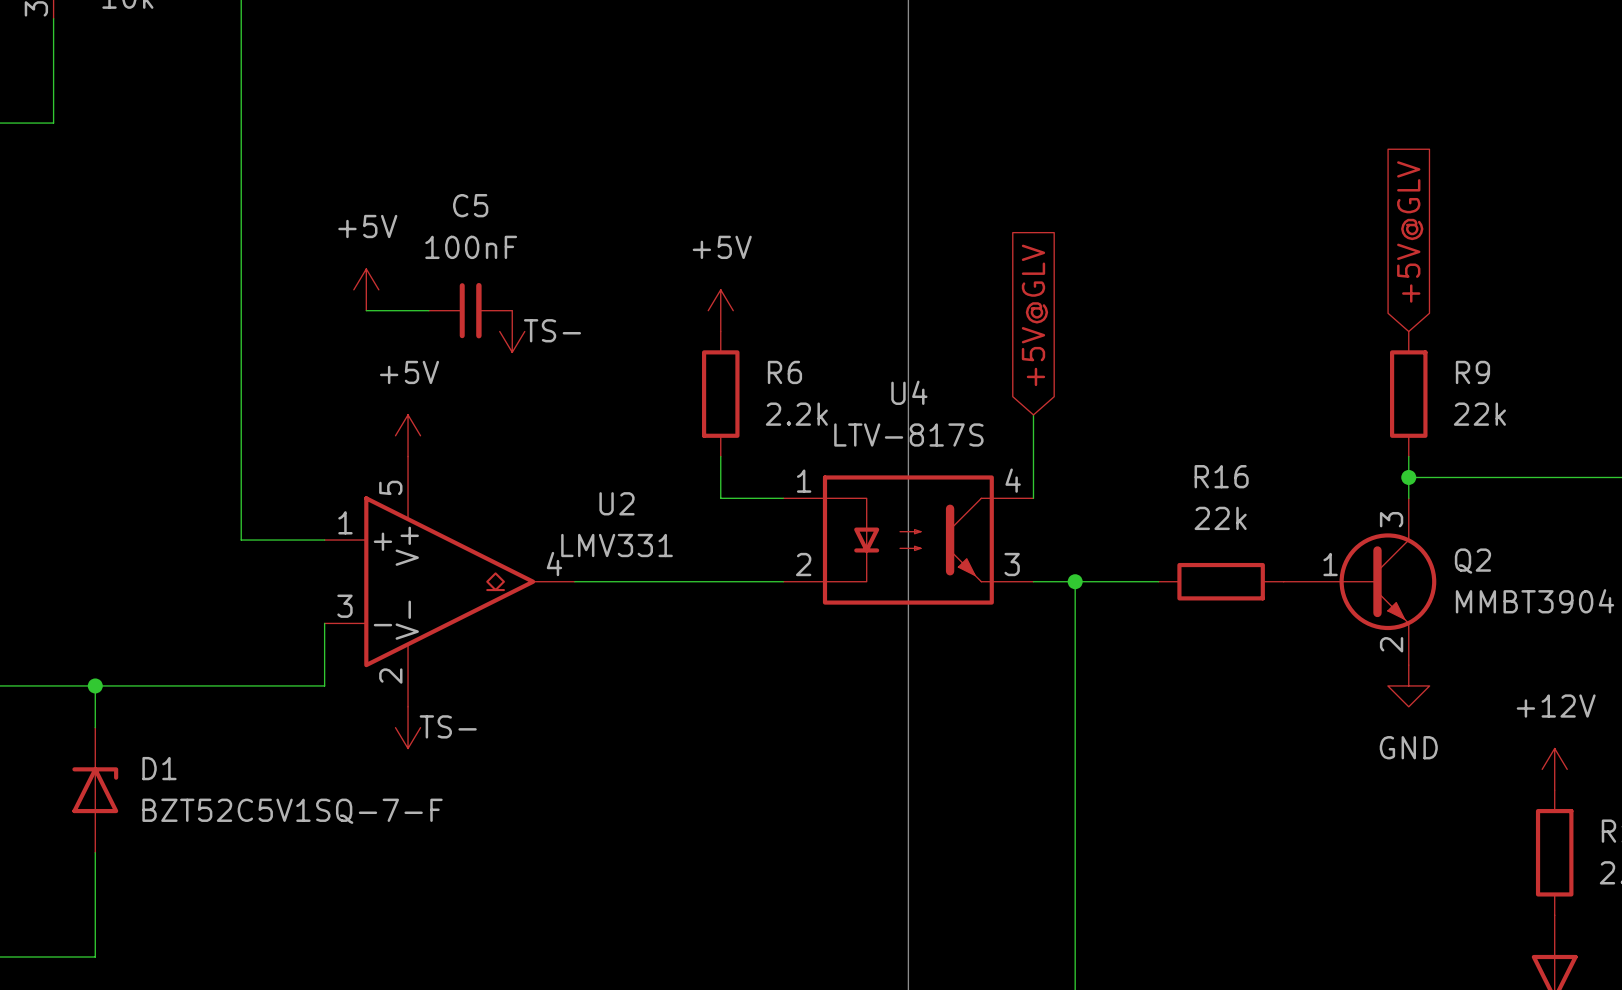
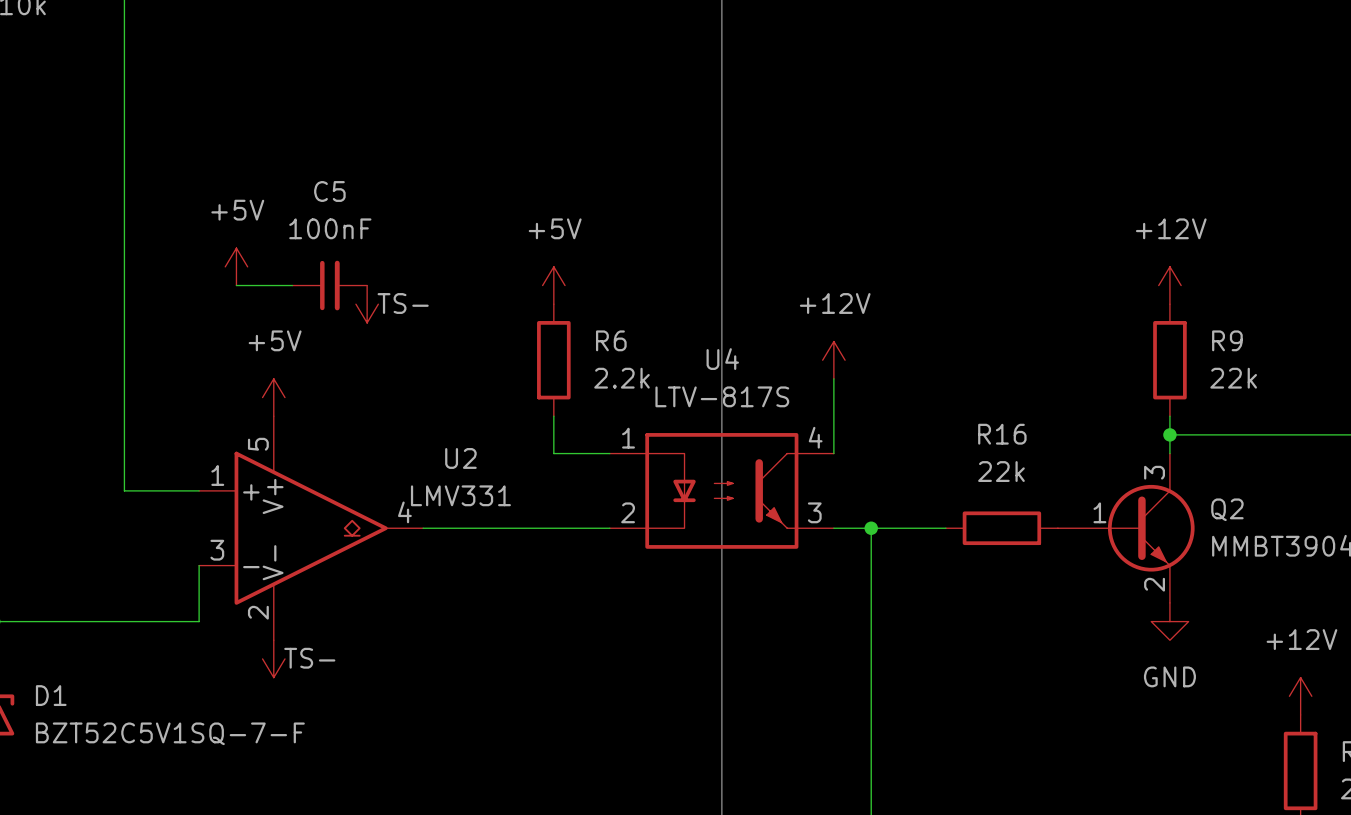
global label: +5V@GLV (1410, 231) -> none
power symbol: none -> +12V (1169, 285)
global label: +5V@GLV (1034, 315) -> none
power symbol: none -> +12V (833, 360)

